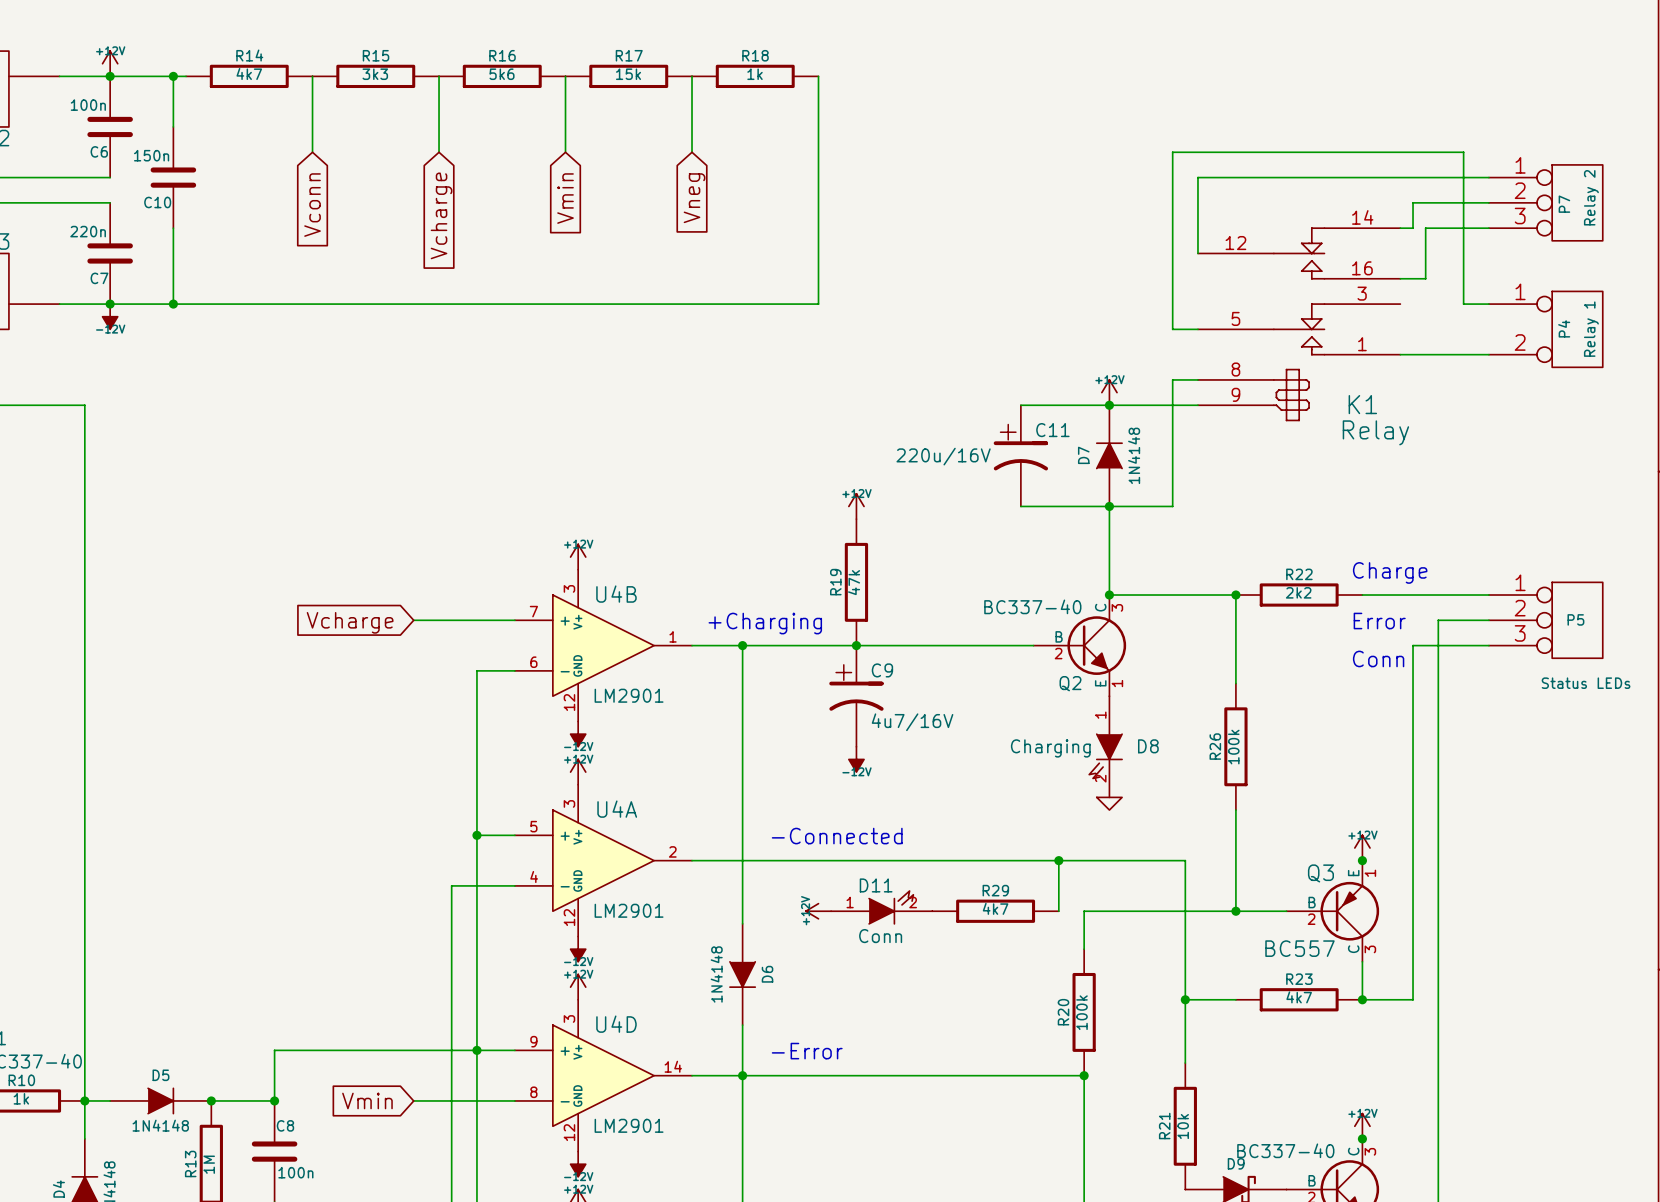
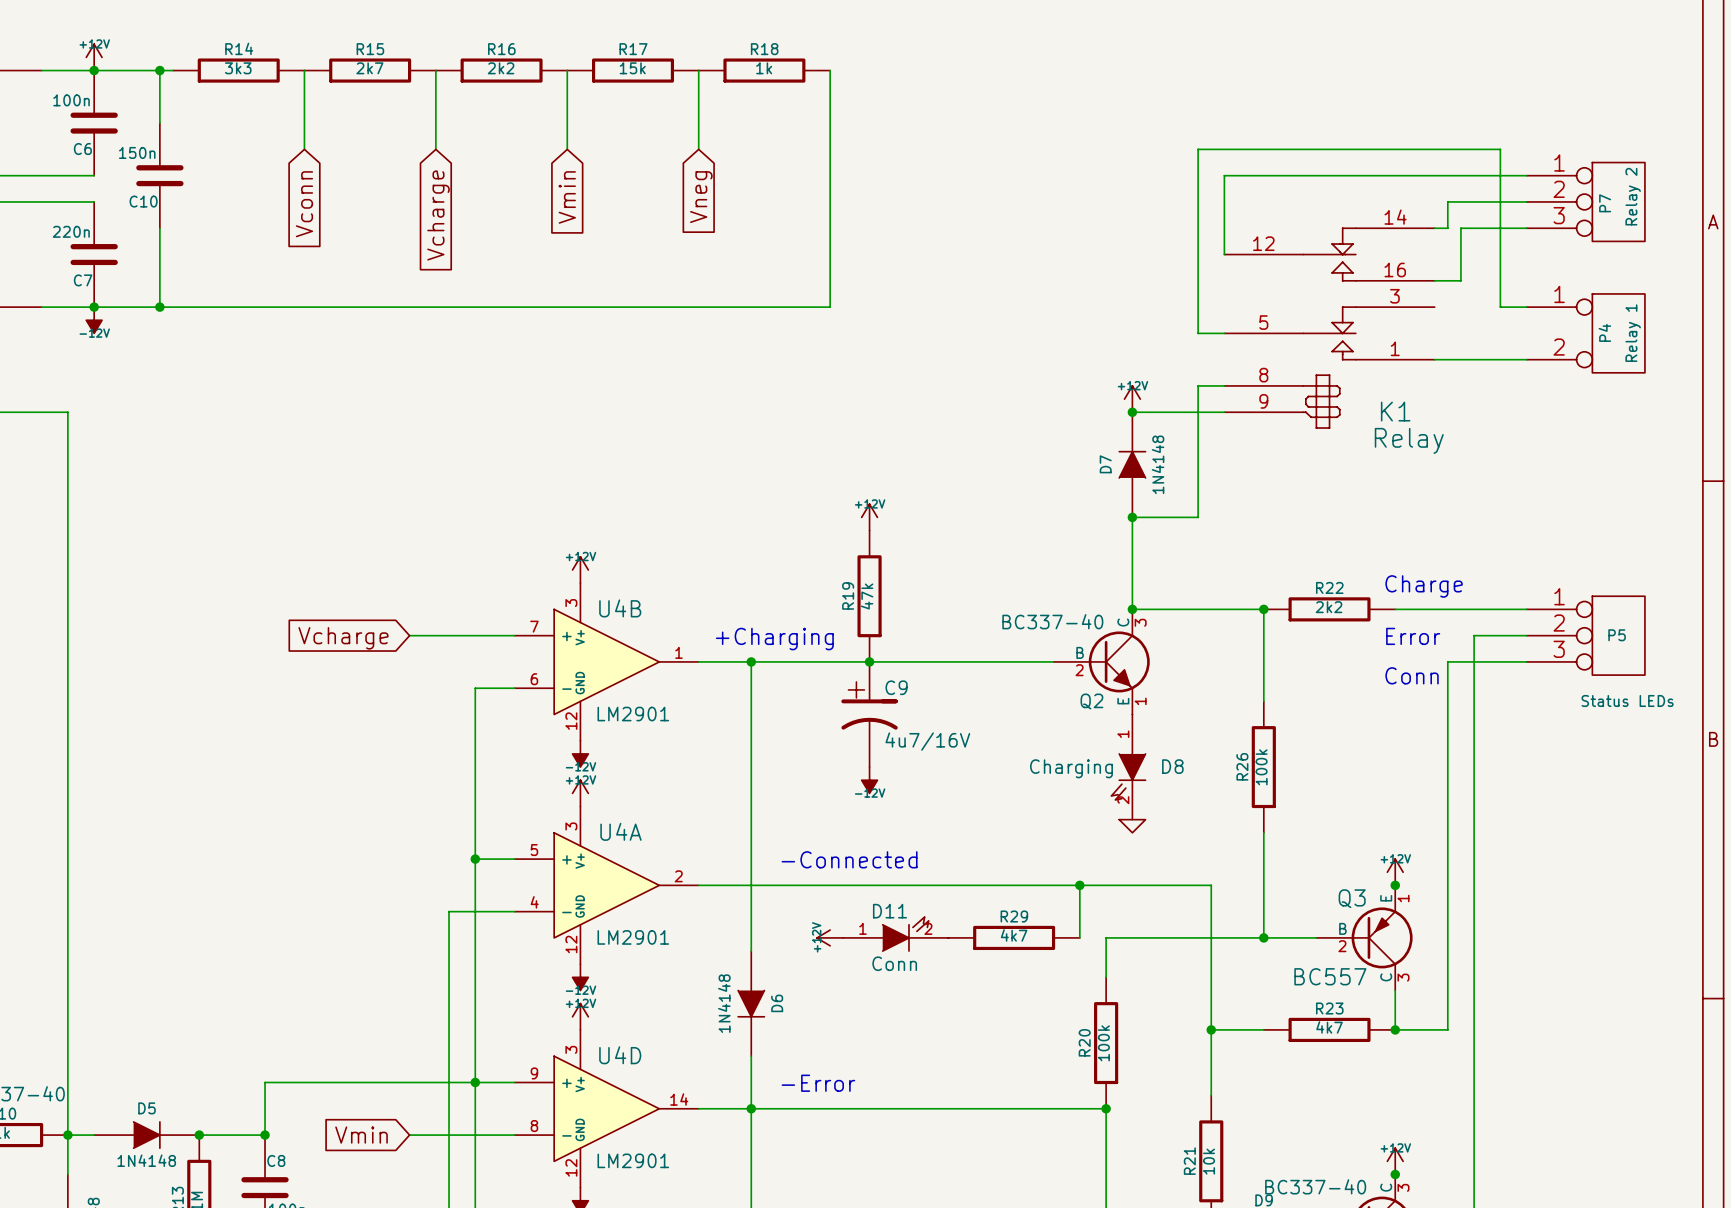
R14 value: 4k7 (249, 73) -> 3k3 (238, 68)
R15 value: 3k3 (375, 74) -> 2k7 (369, 68)
R16 value: 5k6 (502, 74) -> 2k2 (501, 68)
wire: (1020, 405) (1109, 405) -> none
C11: 220u/16V (1020, 455) -> none
wire: (1020, 506) (1109, 506) -> none

